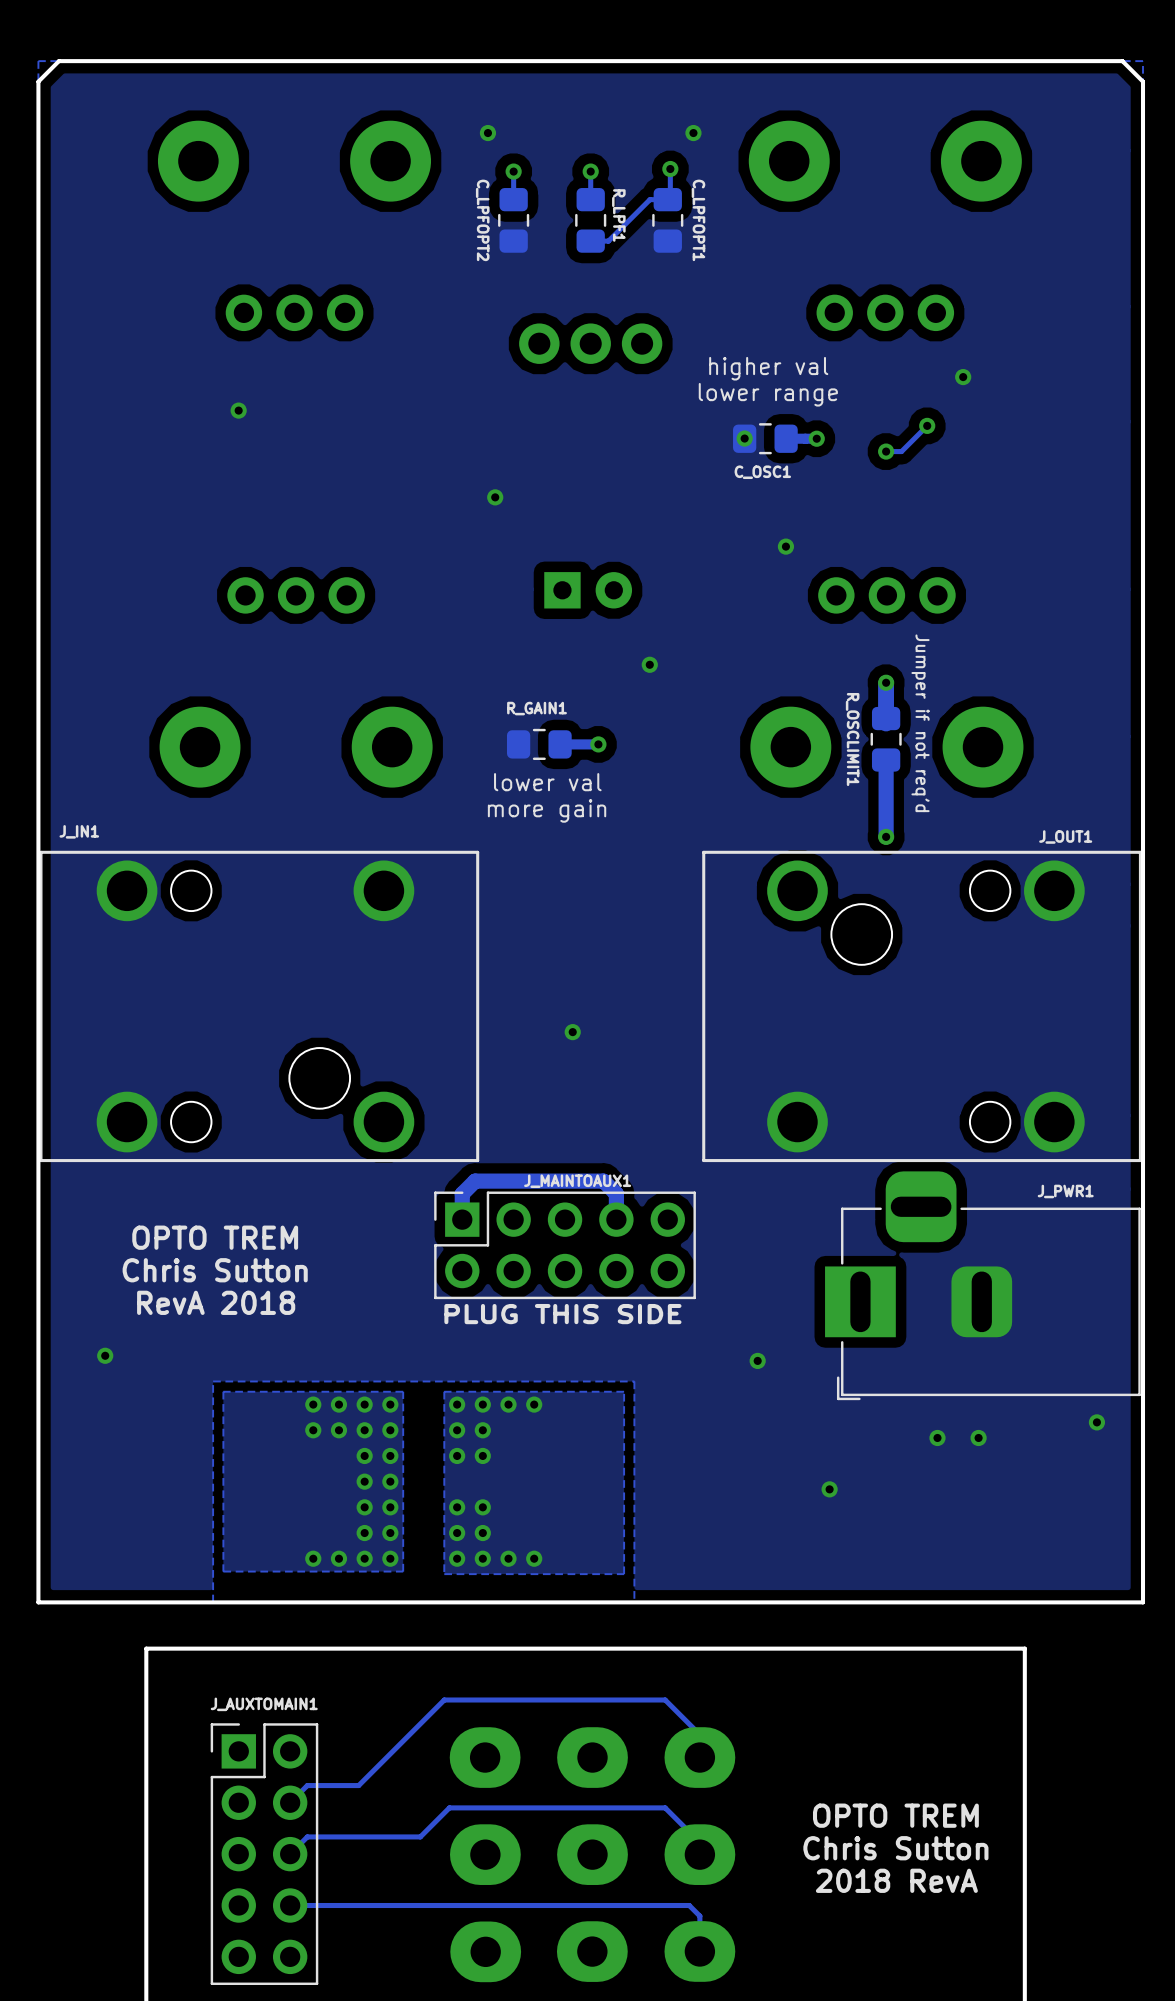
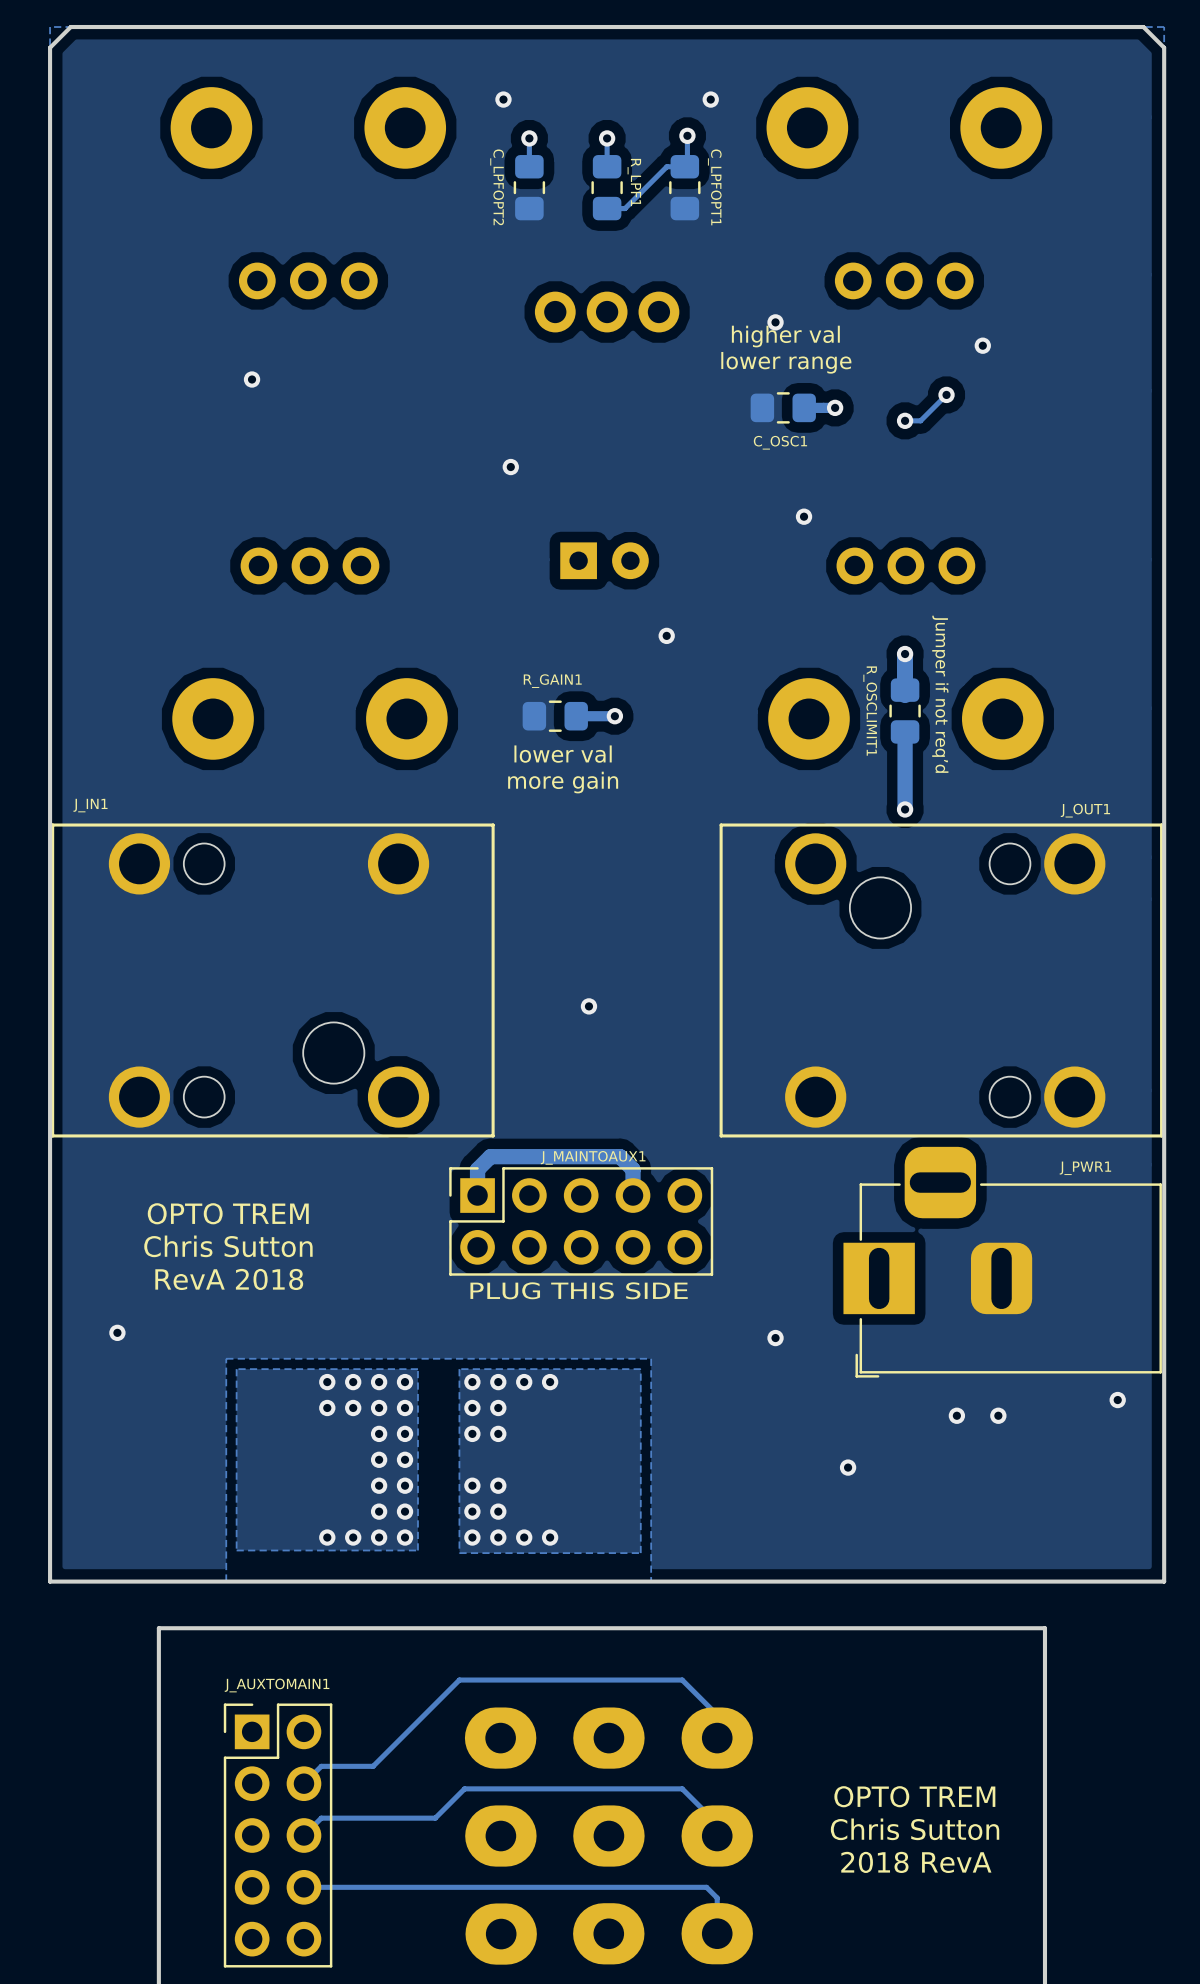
via position: (744, 438) -> (775, 322)

